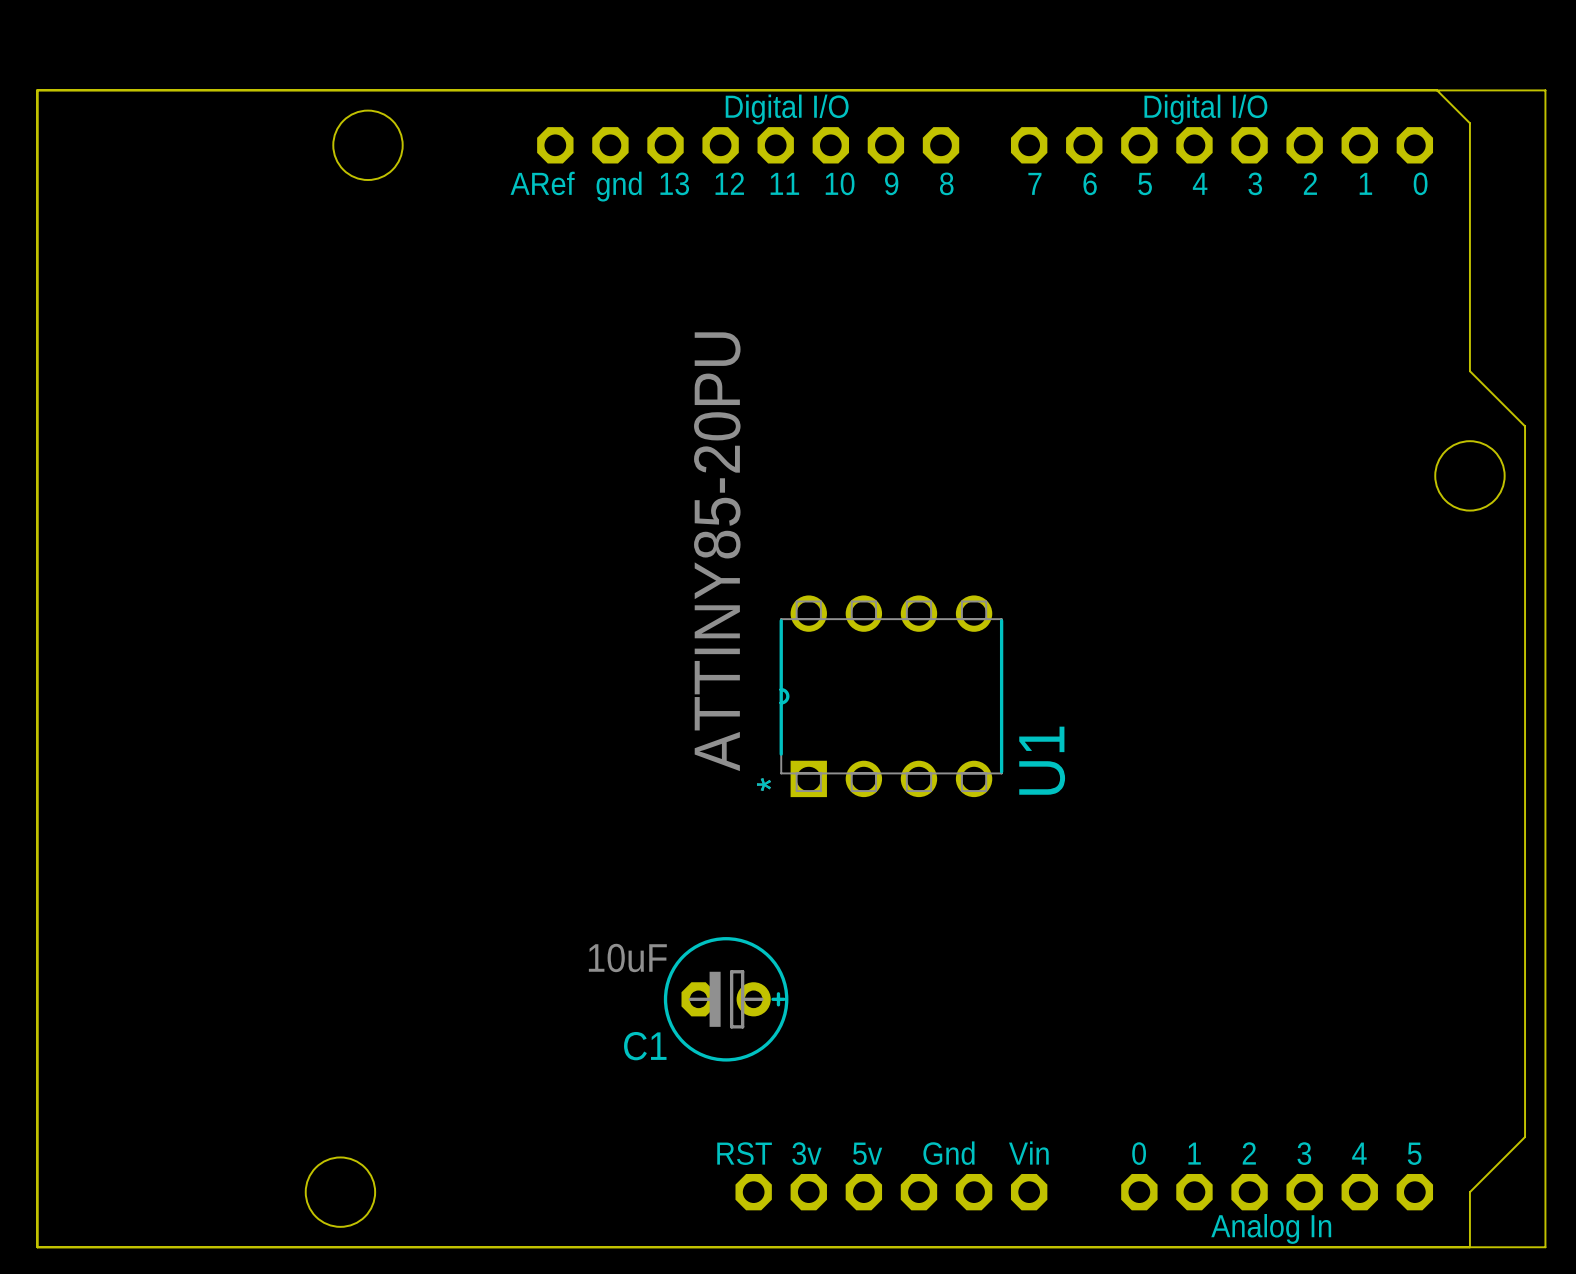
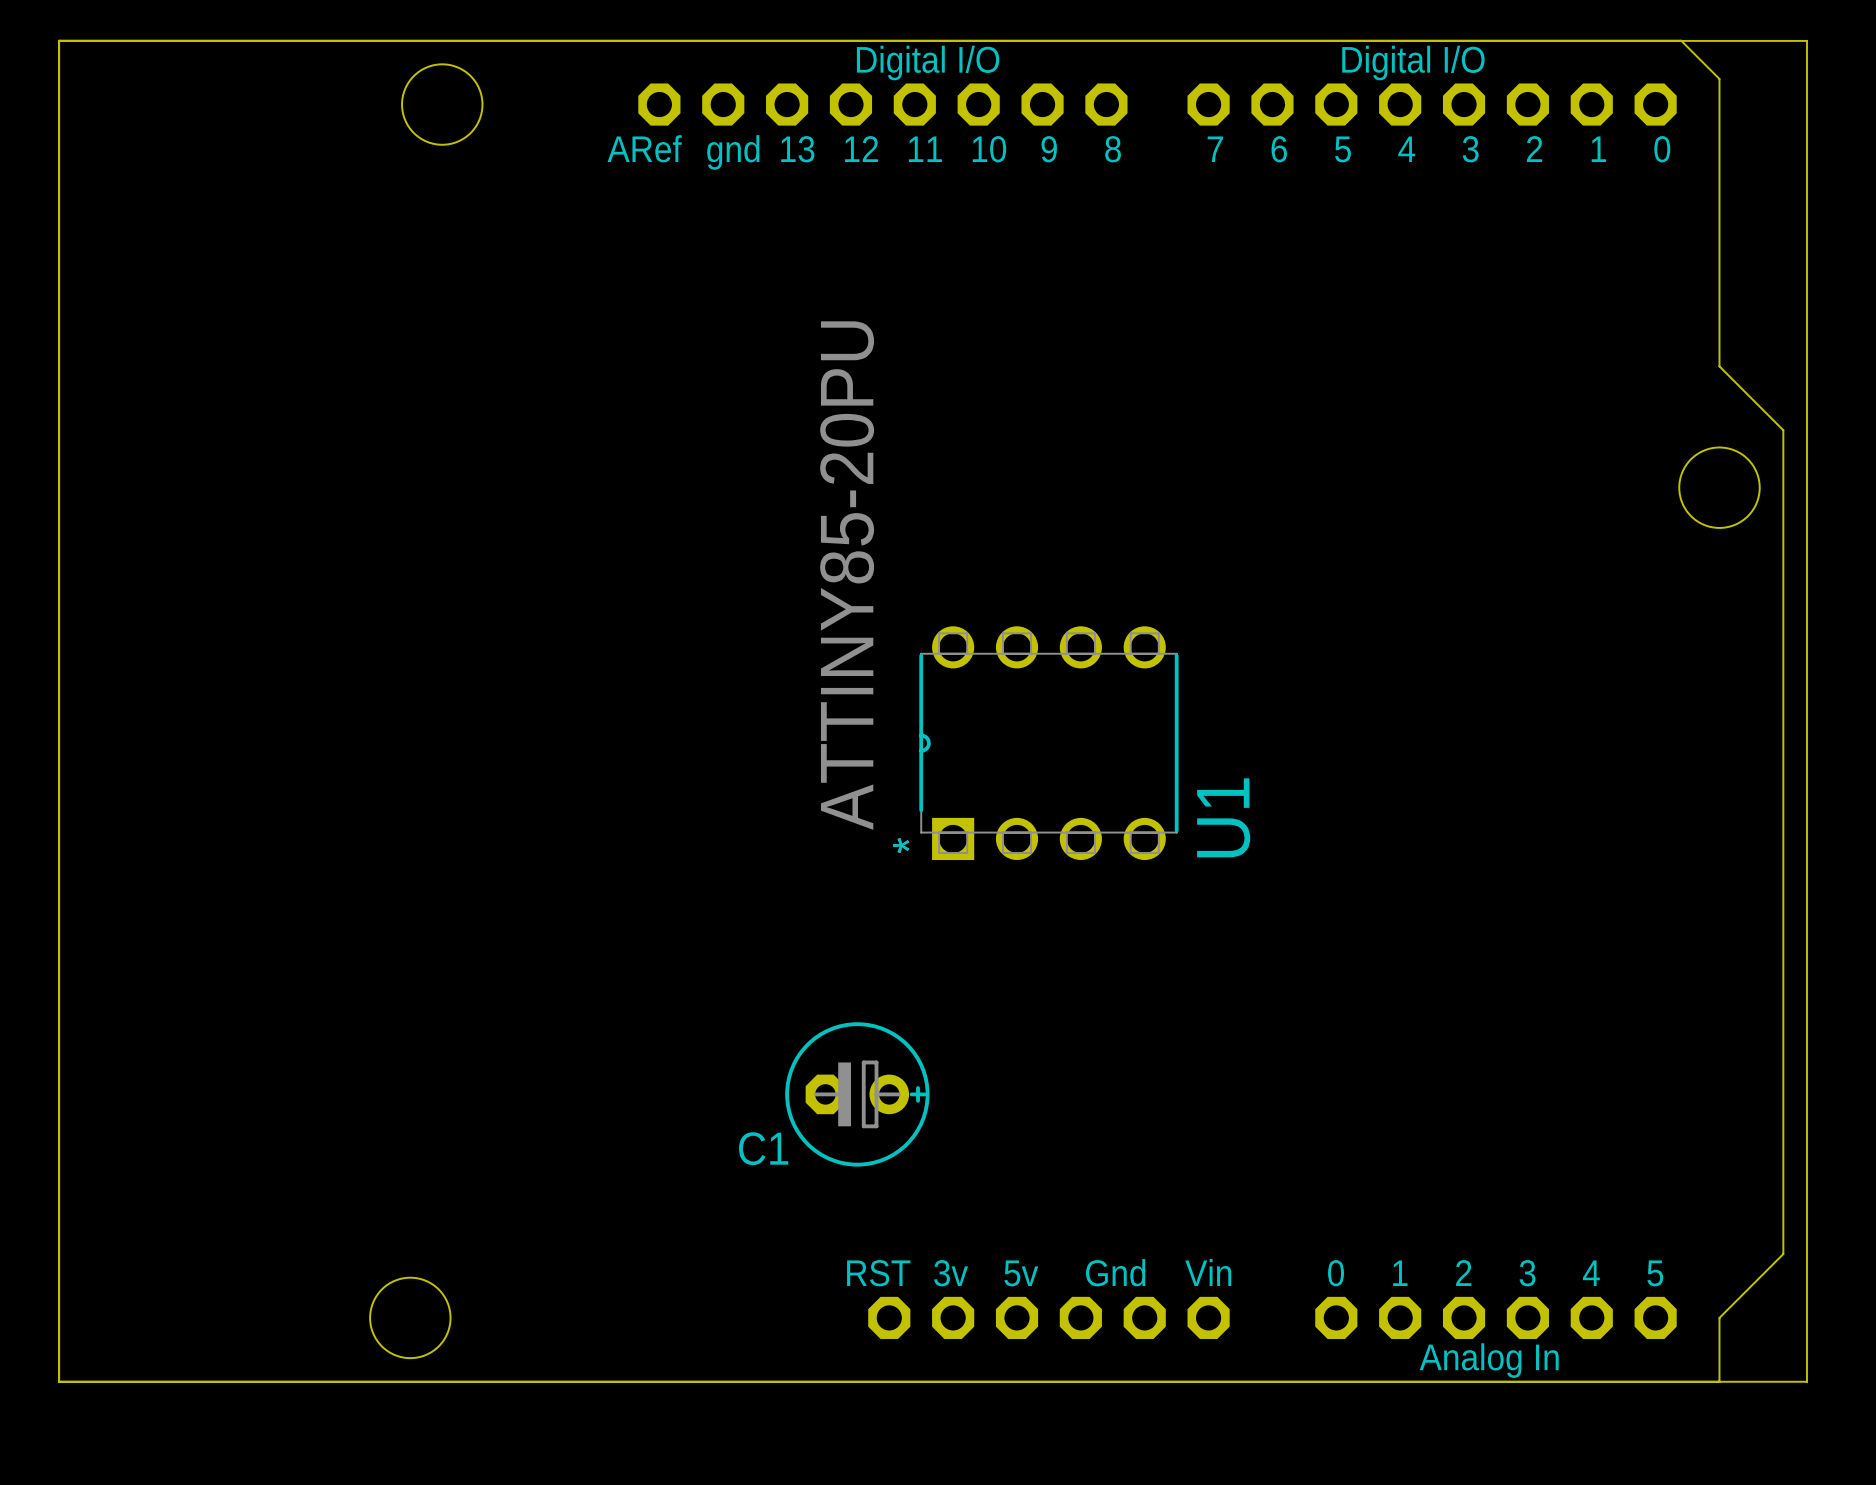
C1 value: 10uF (627, 957) -> none

